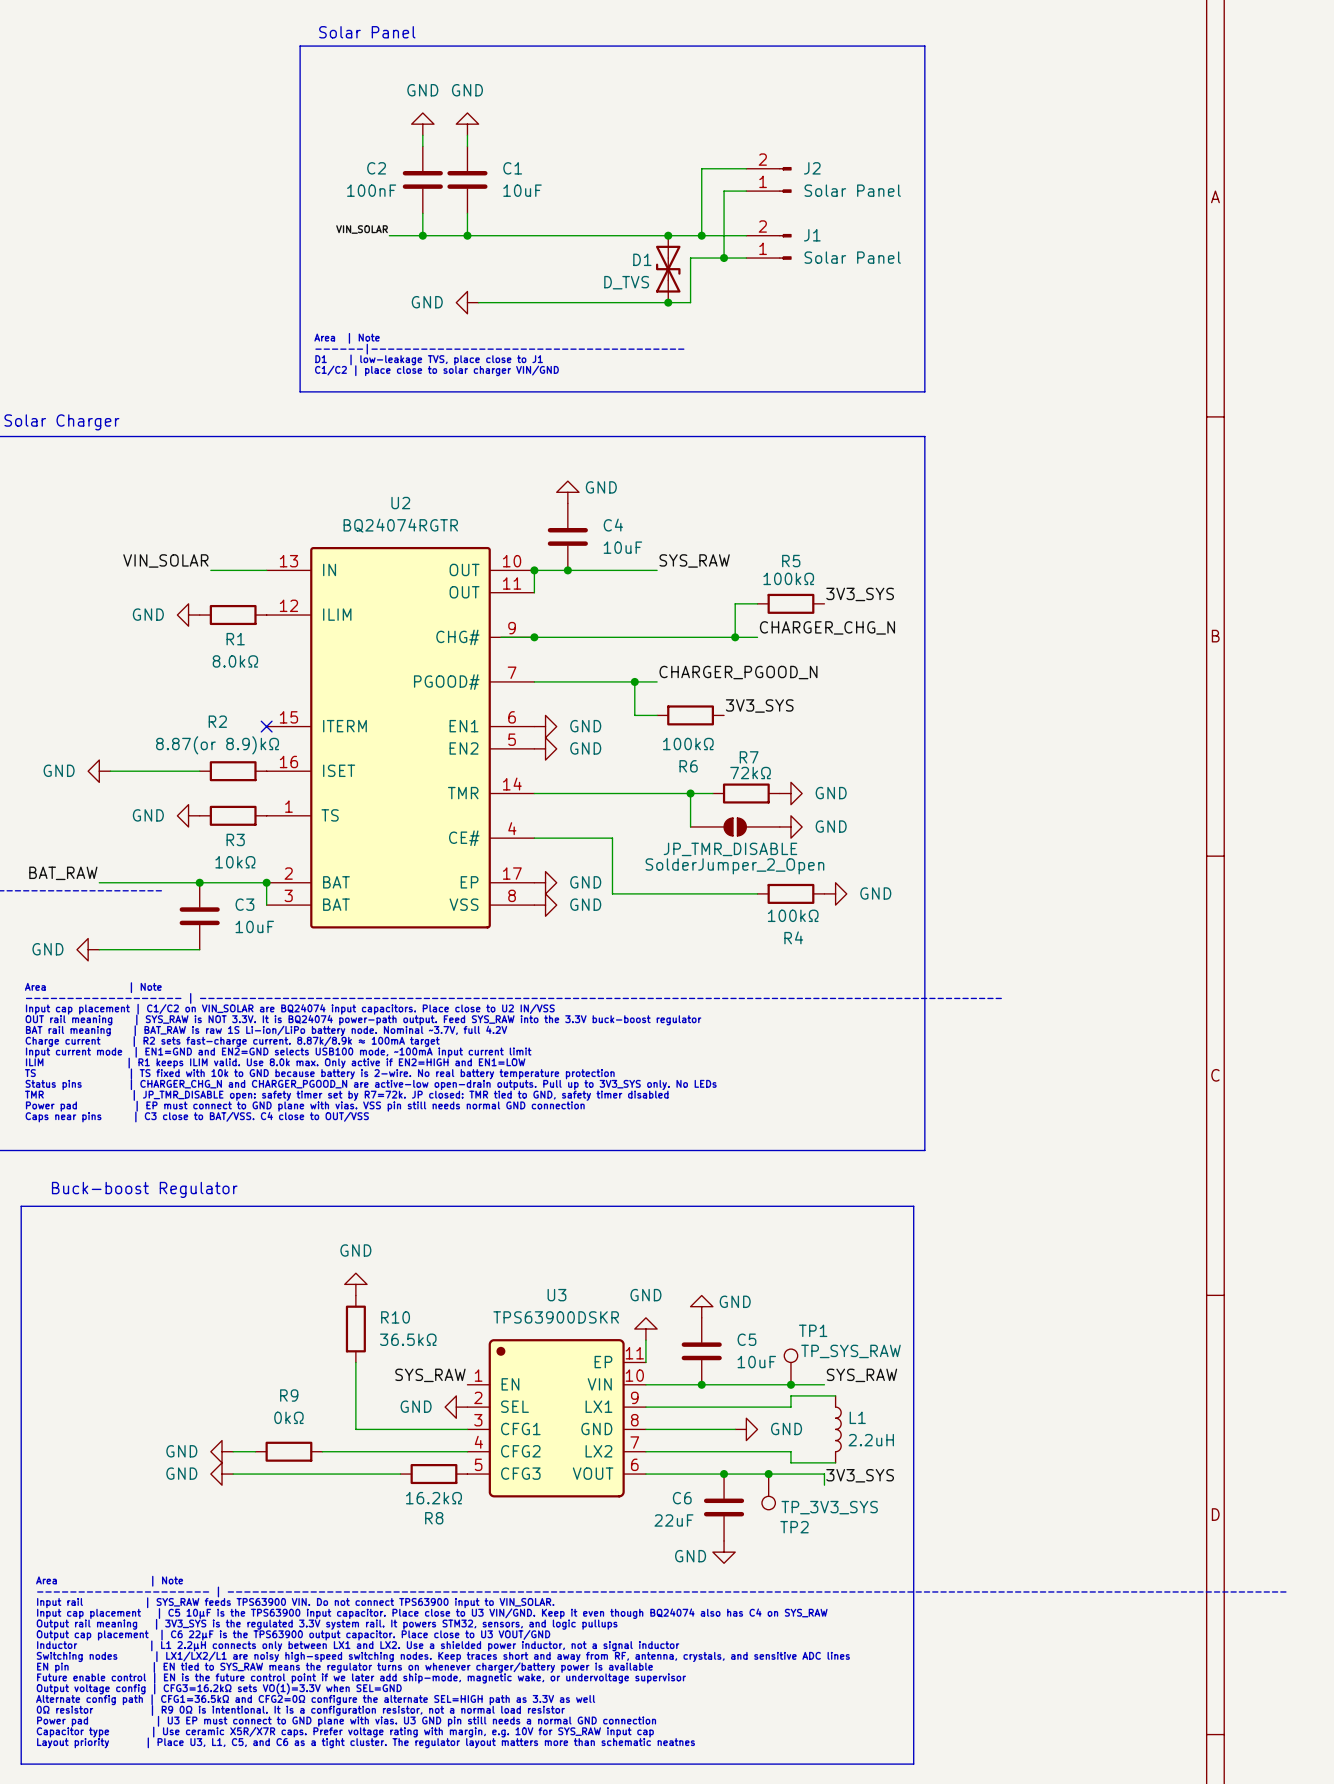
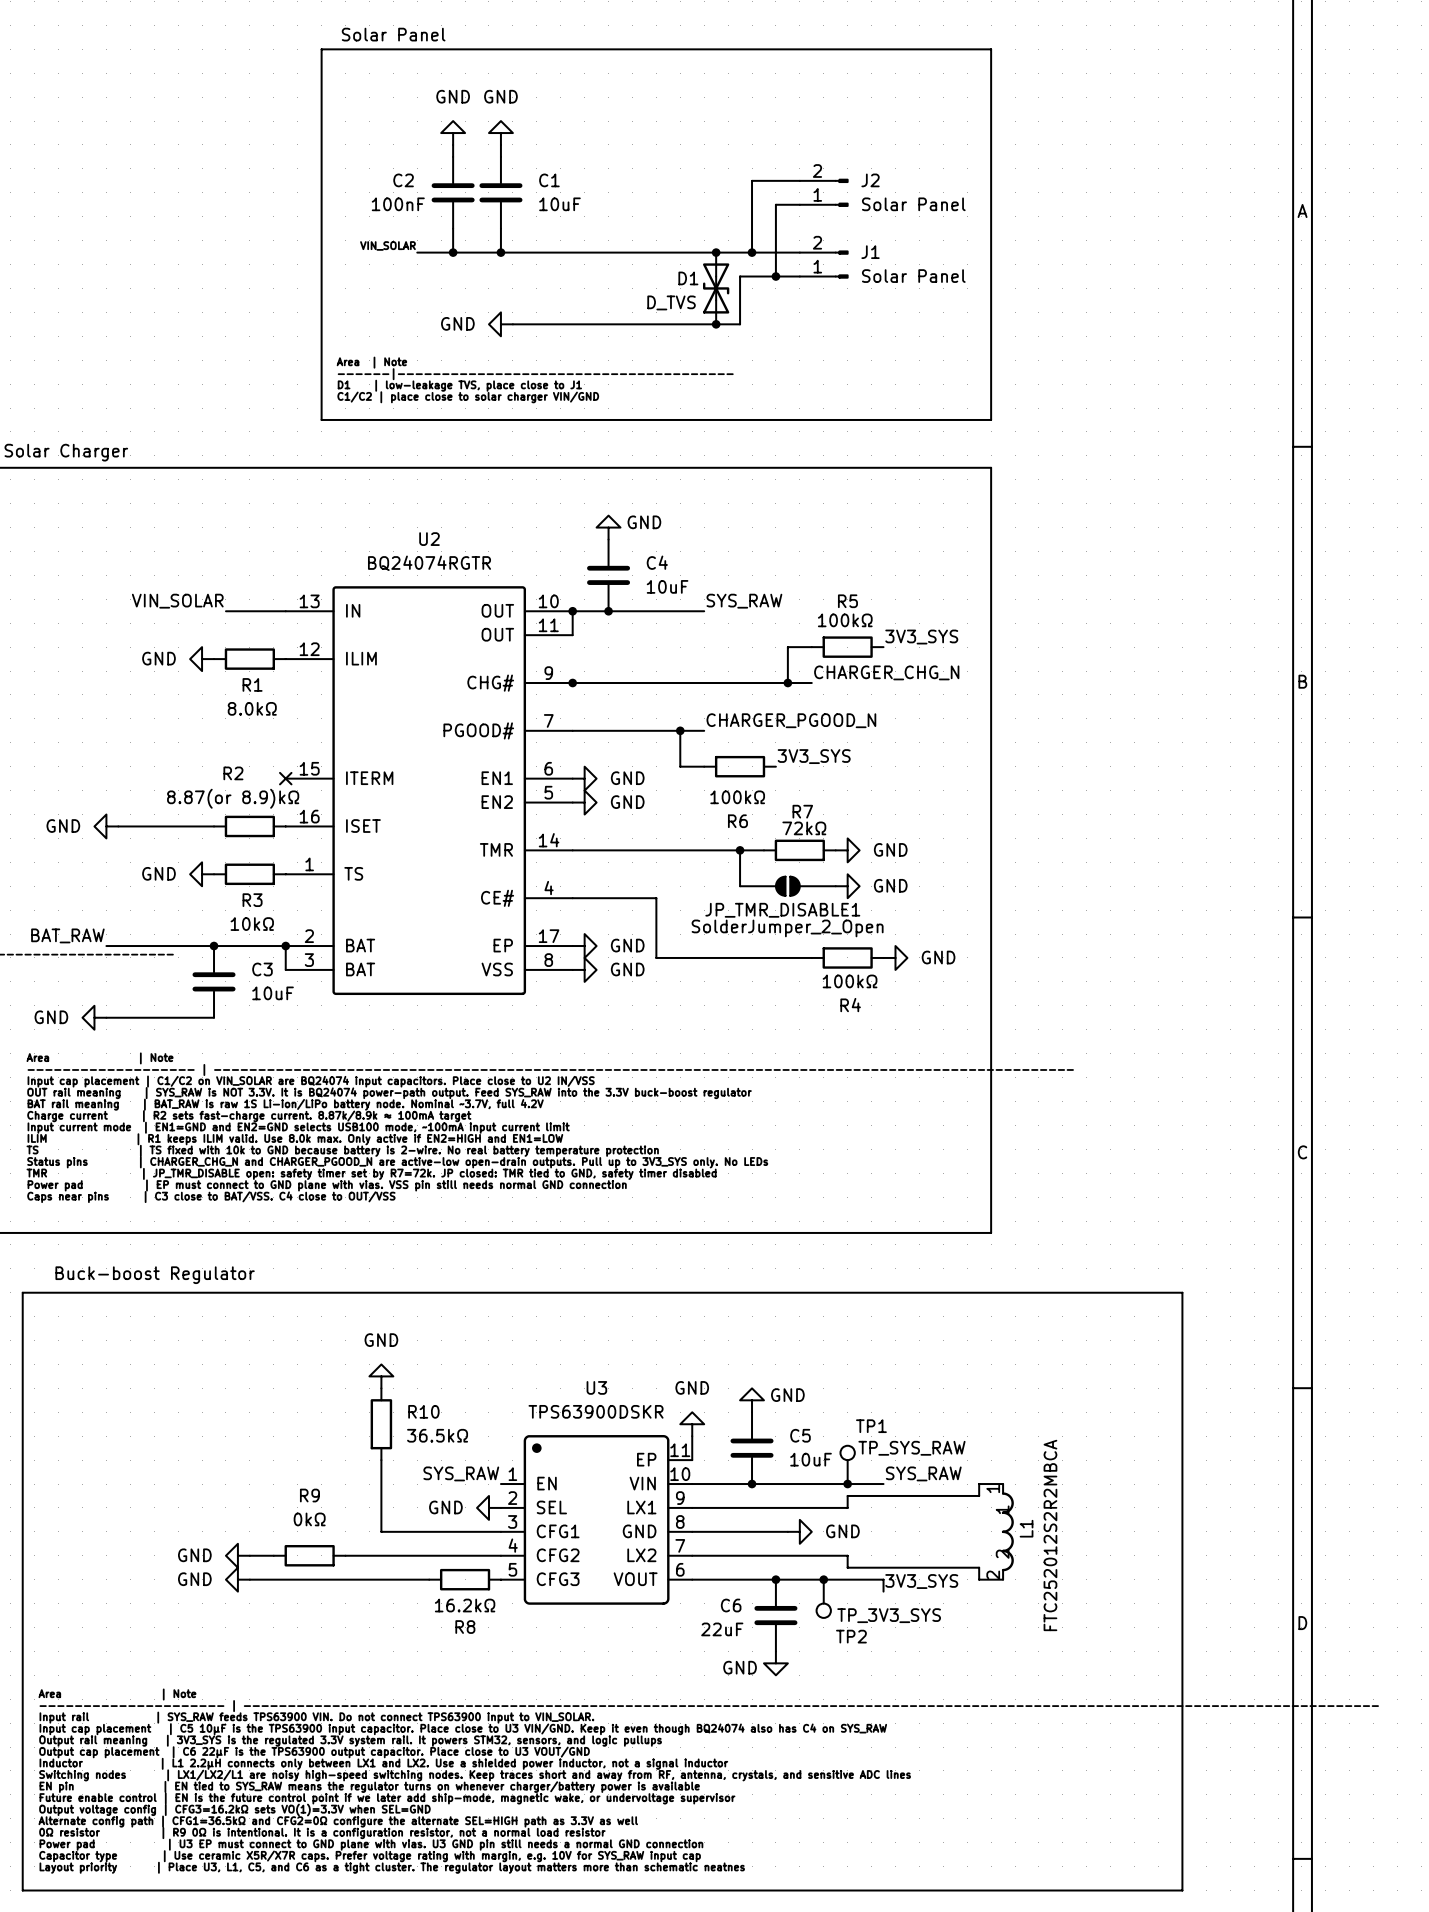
JP_TMR_DISABLE name: JP_TMR_DISABLE (730, 849) -> JP_TMR_DISABLE1 (782, 910)
line: (913, 1206) (913, 1764) -> (979, 1292) (1182, 1292) (1182, 1890) (979, 1890)
wire: none -> (1003, 1484) (979, 1484) (979, 1495) (895, 1495)
L1 symbol: [835, 1395, 842, 1463] -> [1001, 1484, 1014, 1580]
L1 value: 2.2uH (871, 1440) -> FTC252012S2R2MBCA (1050, 1535)
wire: none -> (895, 1567) (979, 1567) (979, 1579) (1003, 1579)

